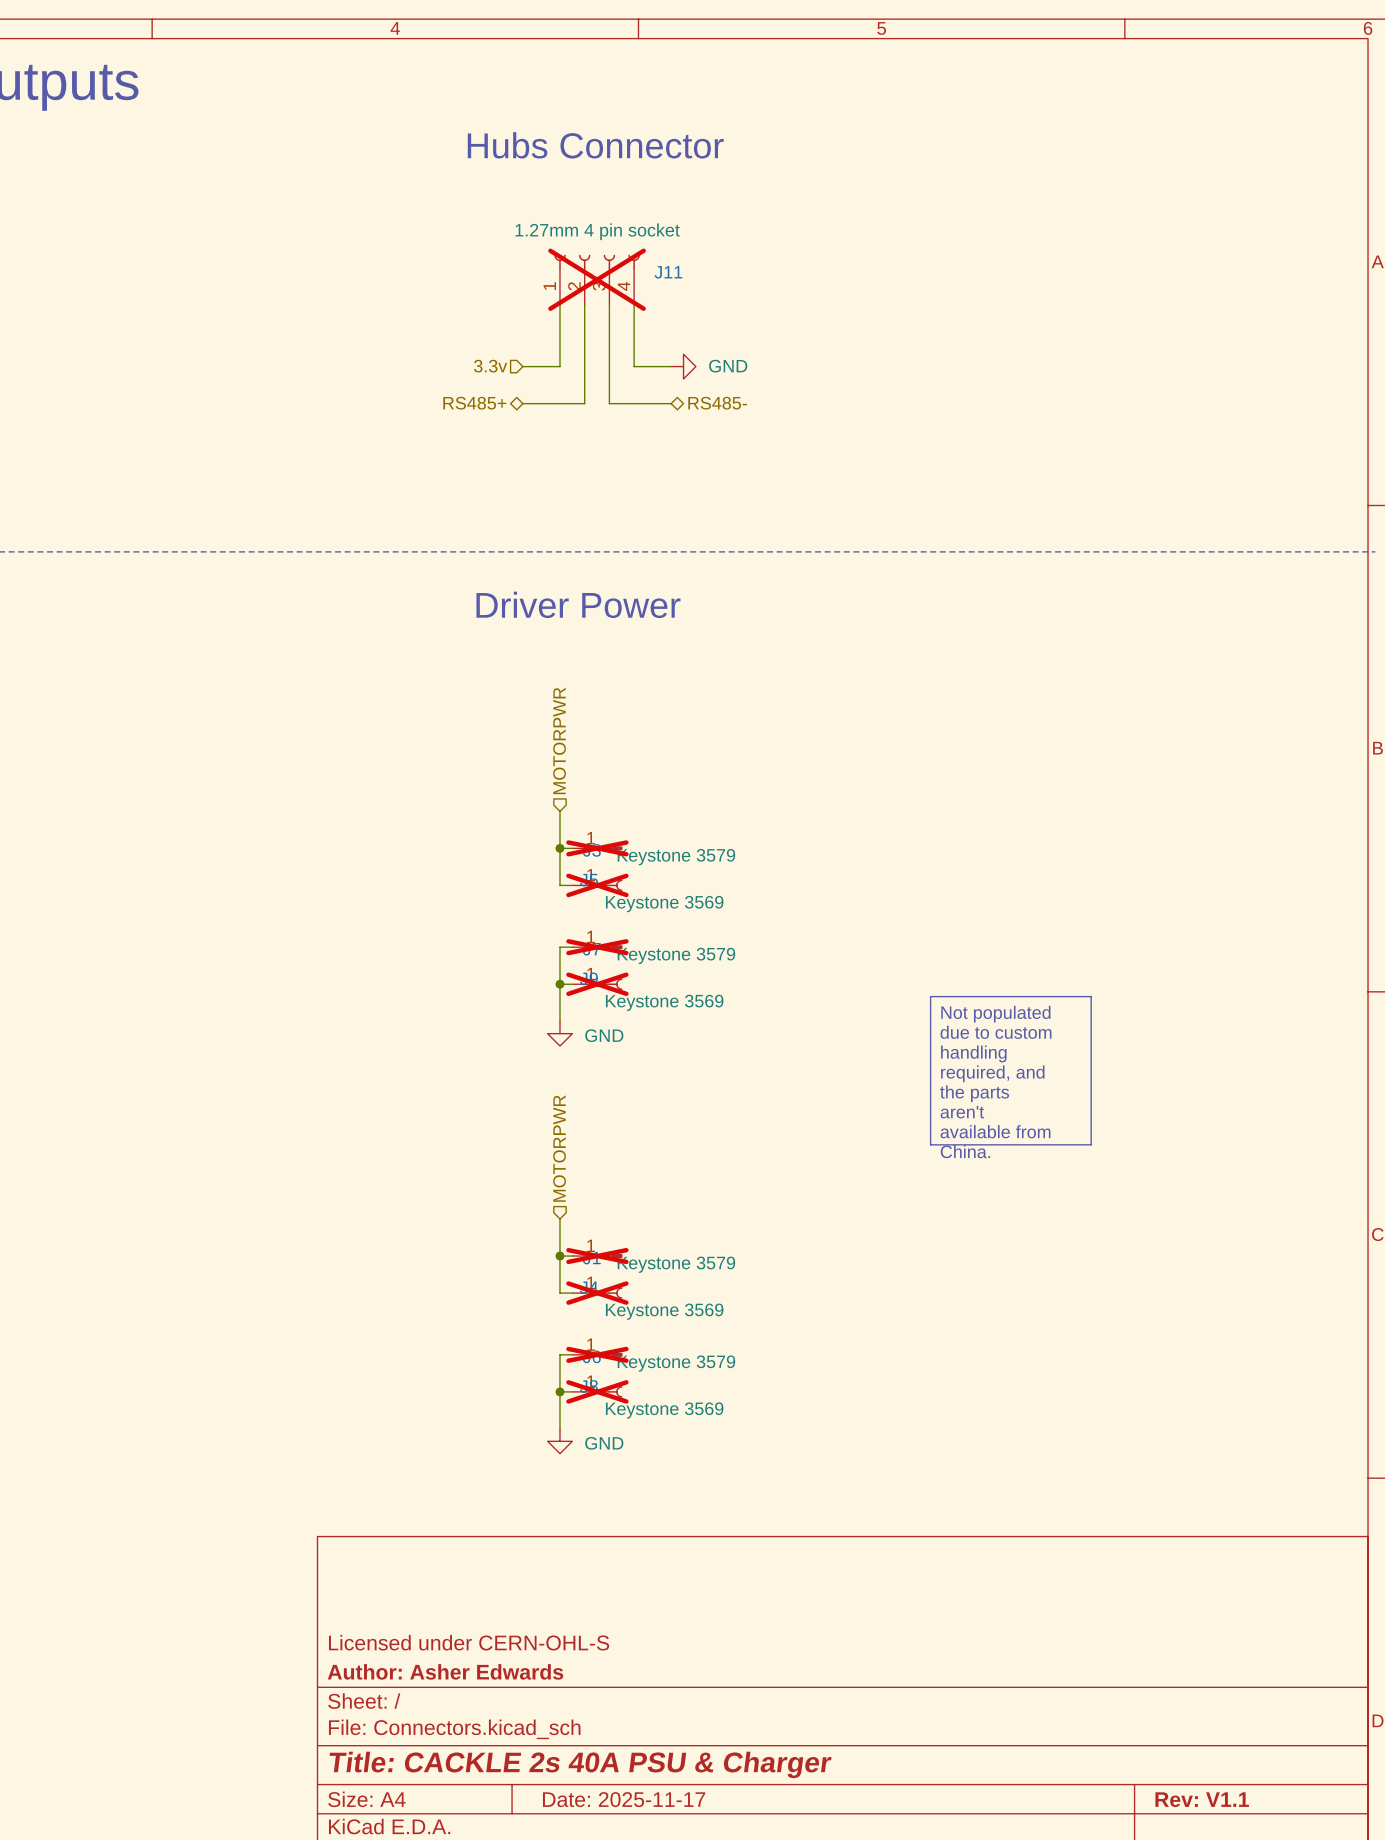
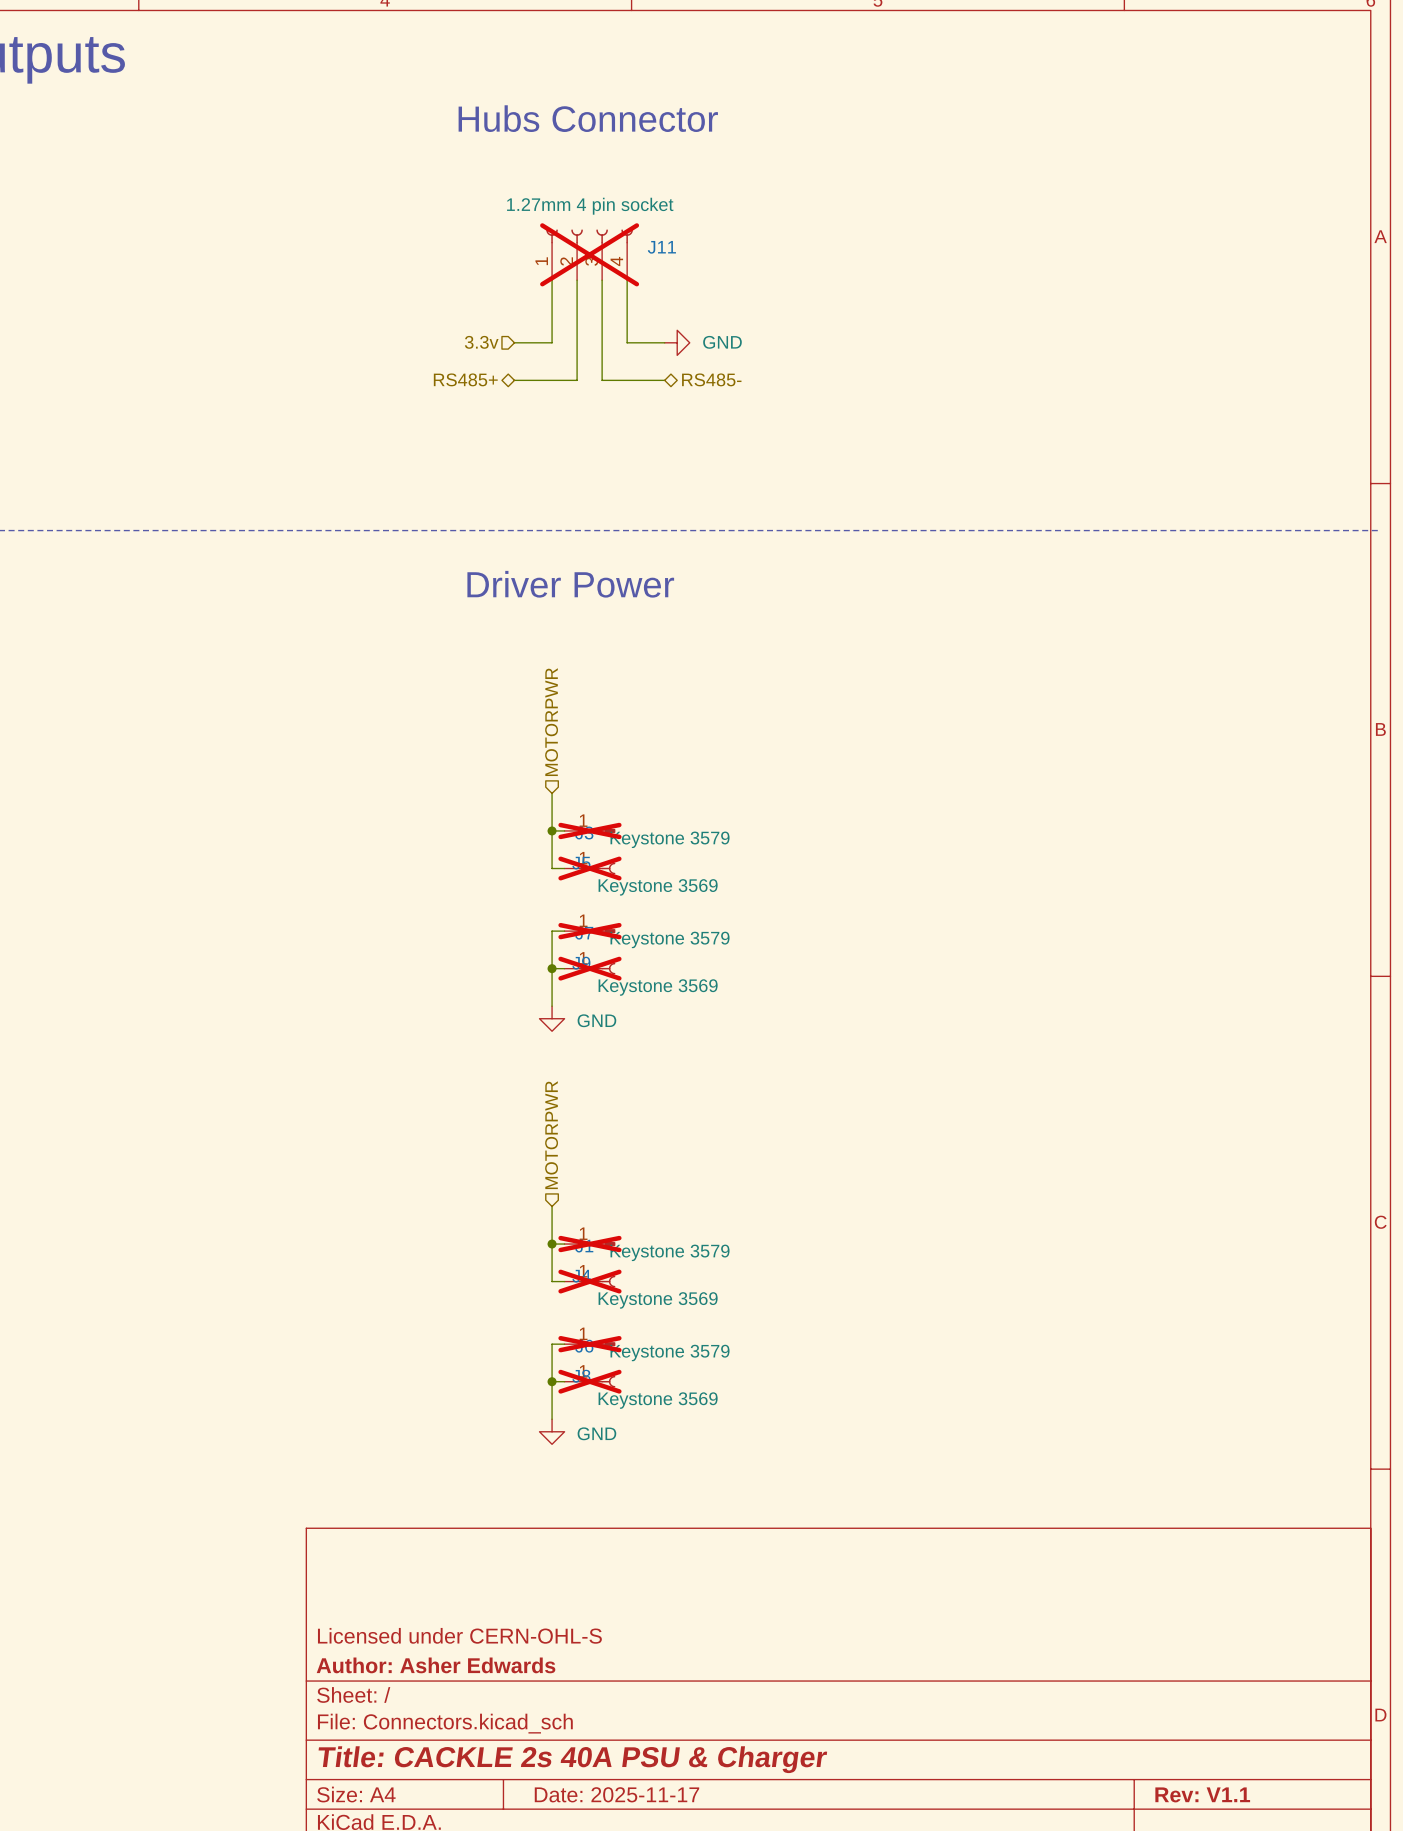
line: (930, 996) (1091, 996) (1091, 1144) (930, 1144) (930, 996) -> none
text: Not populated (995, 1014) -> none
text: due to custom (996, 1032) -> none
text: handling (973, 1053) -> none
text: required, and (992, 1073) -> none
text: the parts (974, 1093) -> none
text: aren't (962, 1112) -> none
text: available from (995, 1131) -> none
text: China. (965, 1151) -> none

